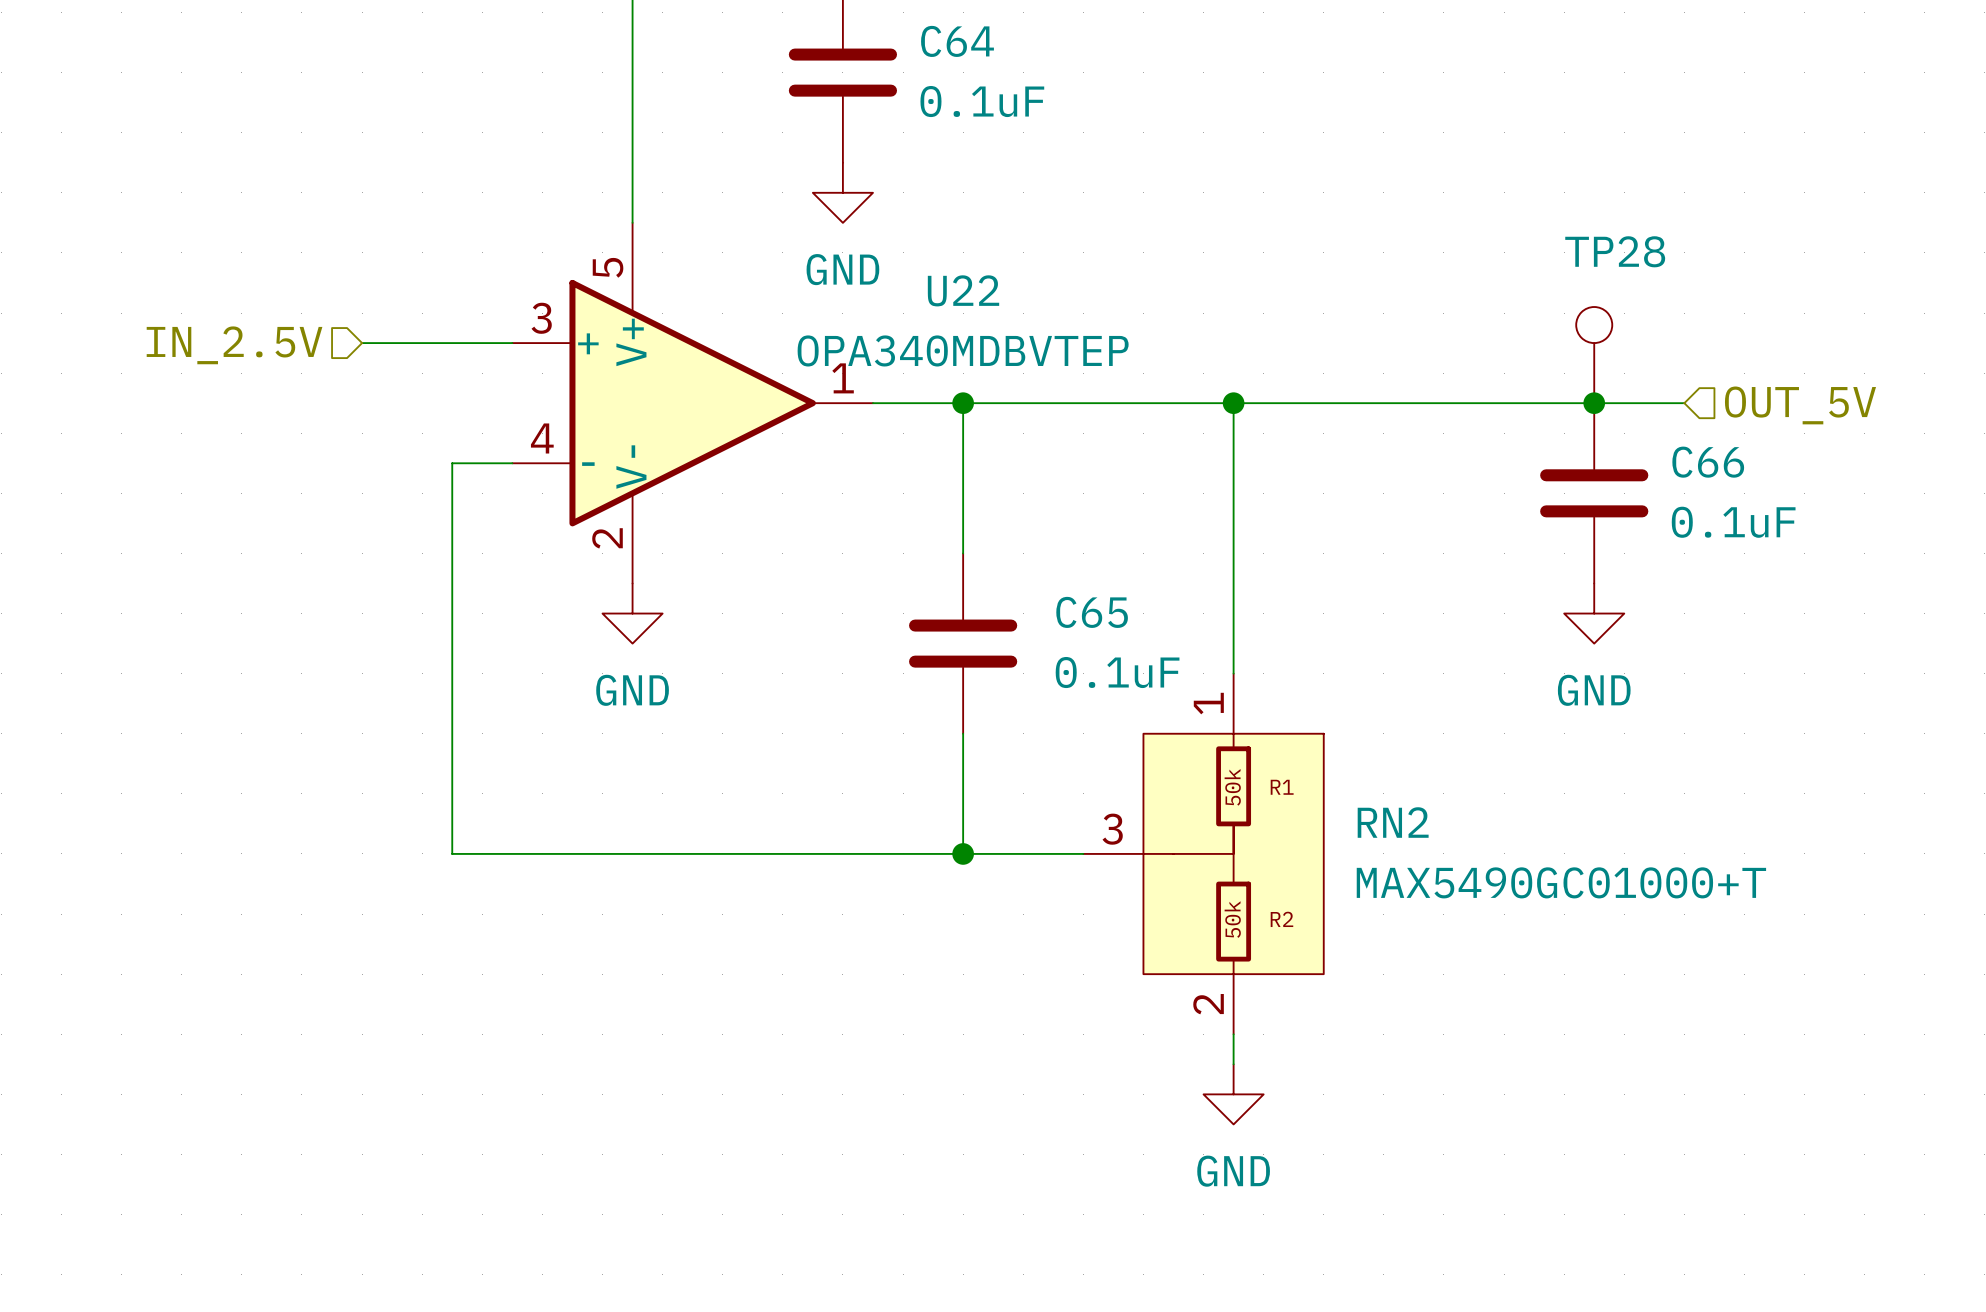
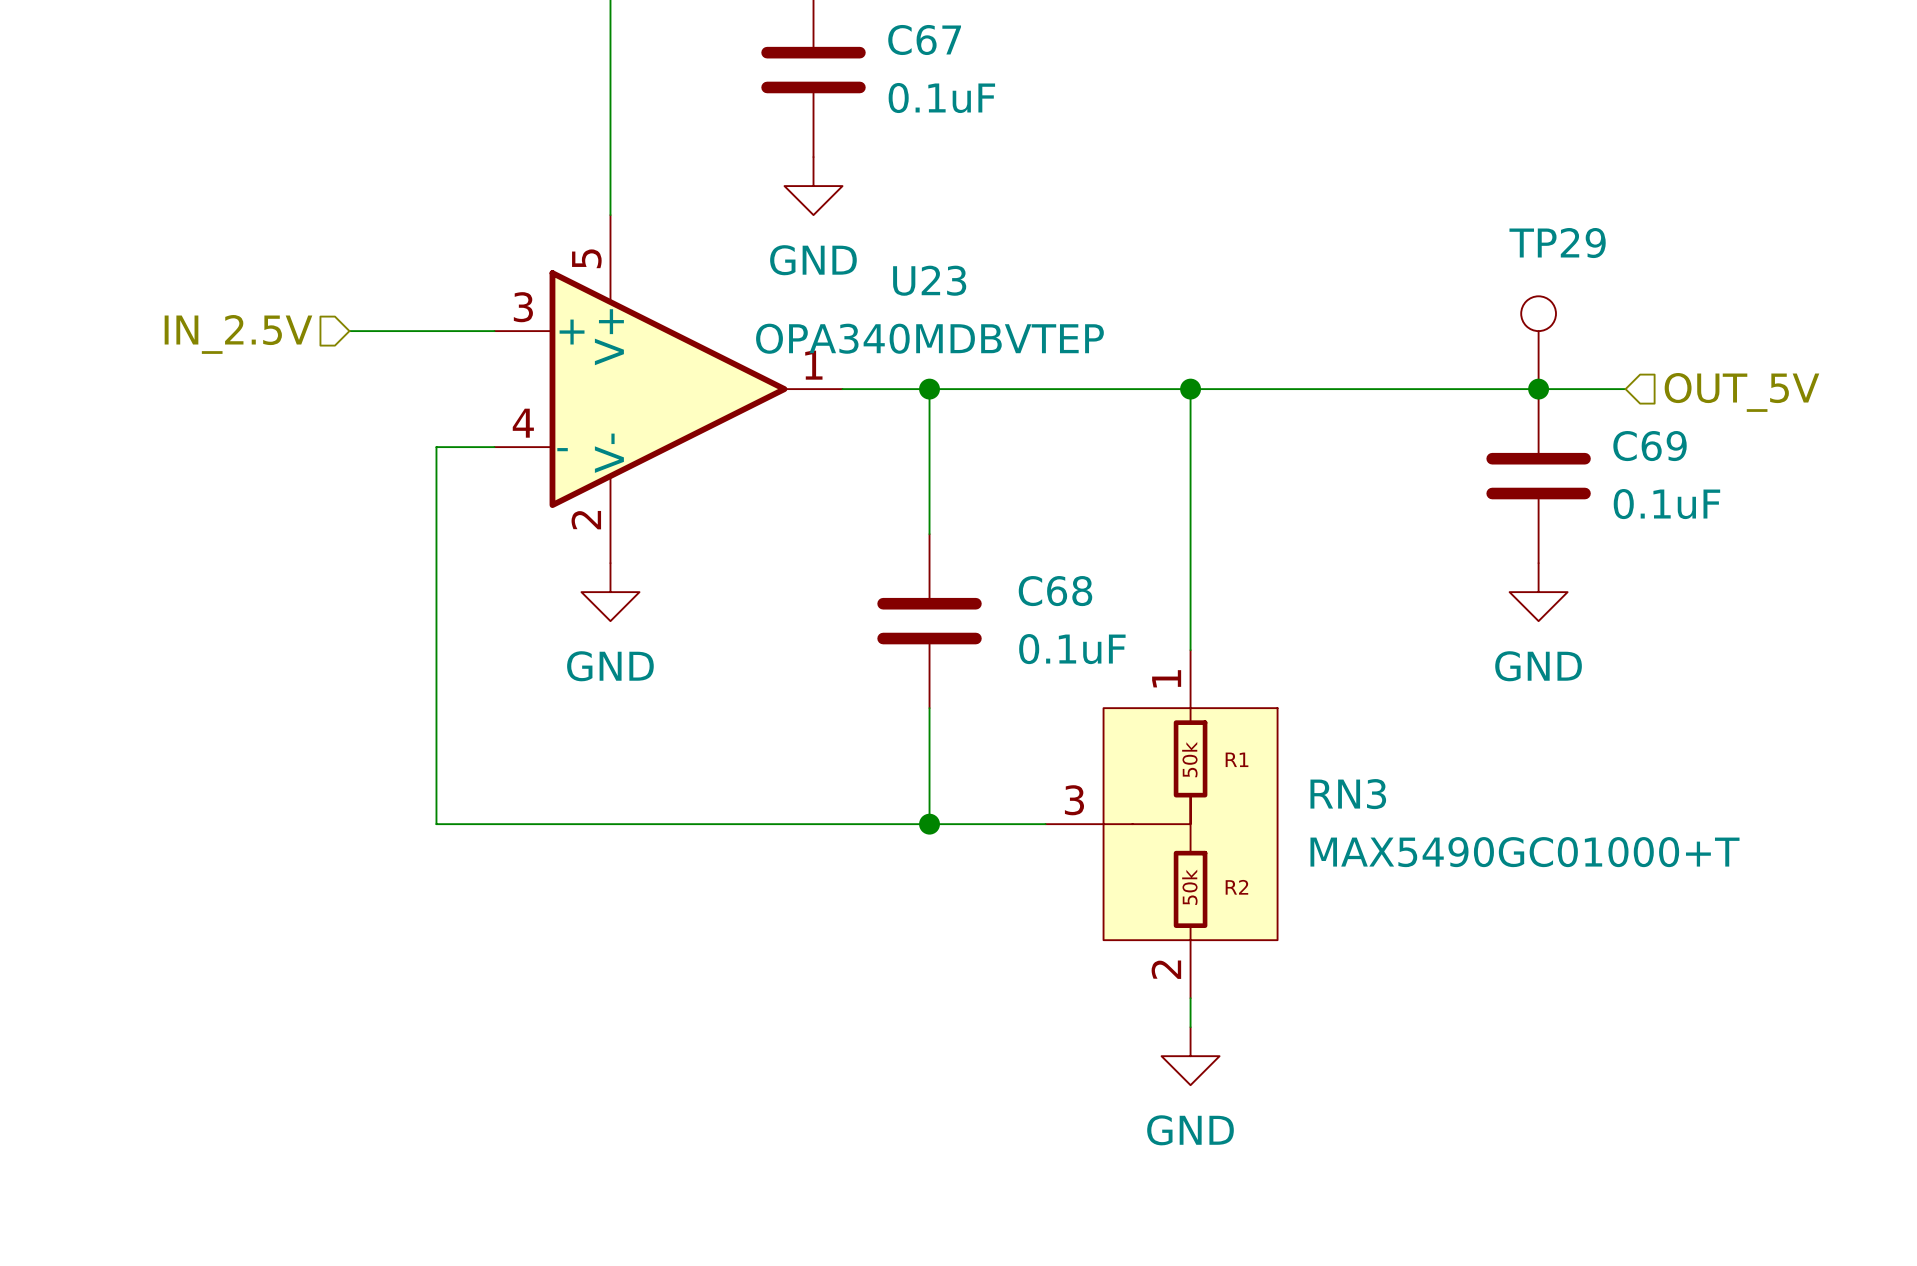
C64 name: C64 (957, 41) -> C67 (924, 39)
TP28 name: TP28 (1615, 251) -> TP29 (1557, 243)
U22 name: U22 (963, 290) -> U23 (929, 280)
C66 name: C66 (1708, 462) -> C69 (1650, 446)
C65 name: C65 (1092, 612) -> C68 (1055, 591)
RN2 name: RN2 (1393, 822) -> RN3 (1348, 794)

